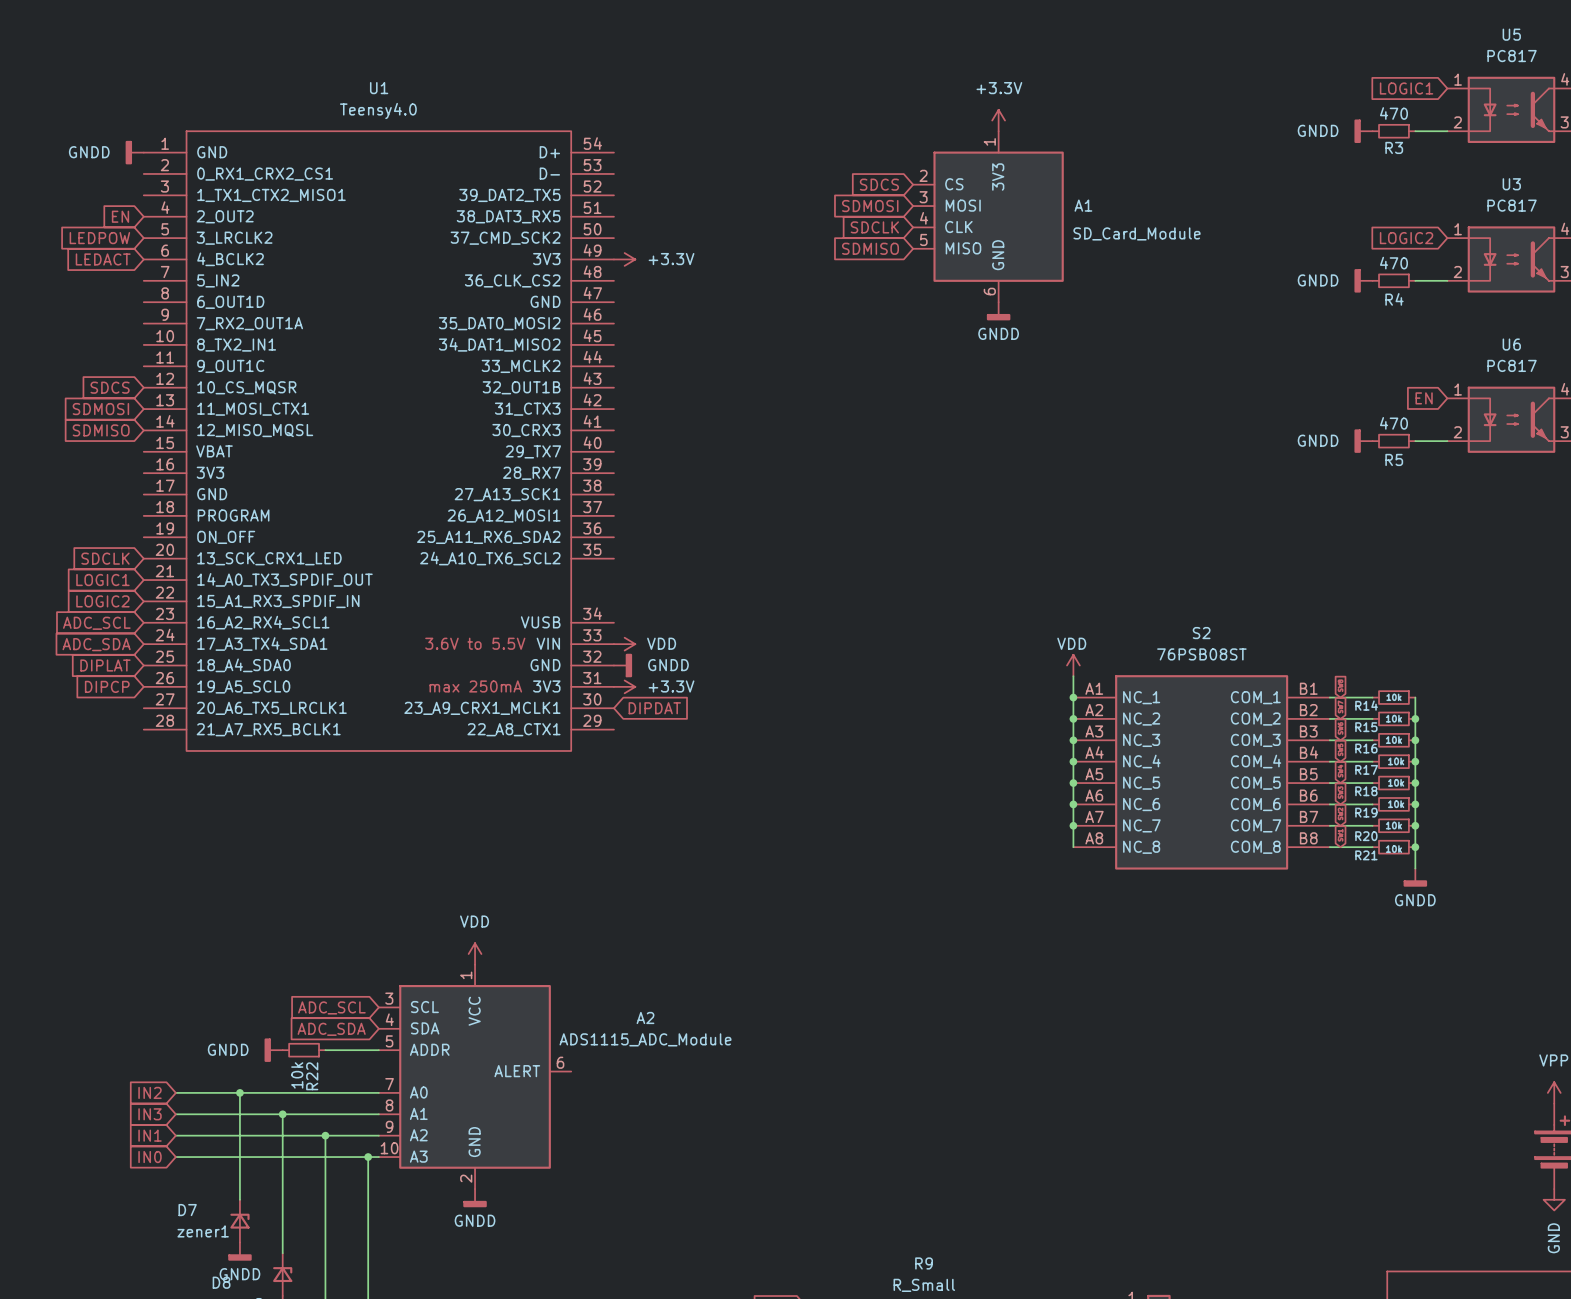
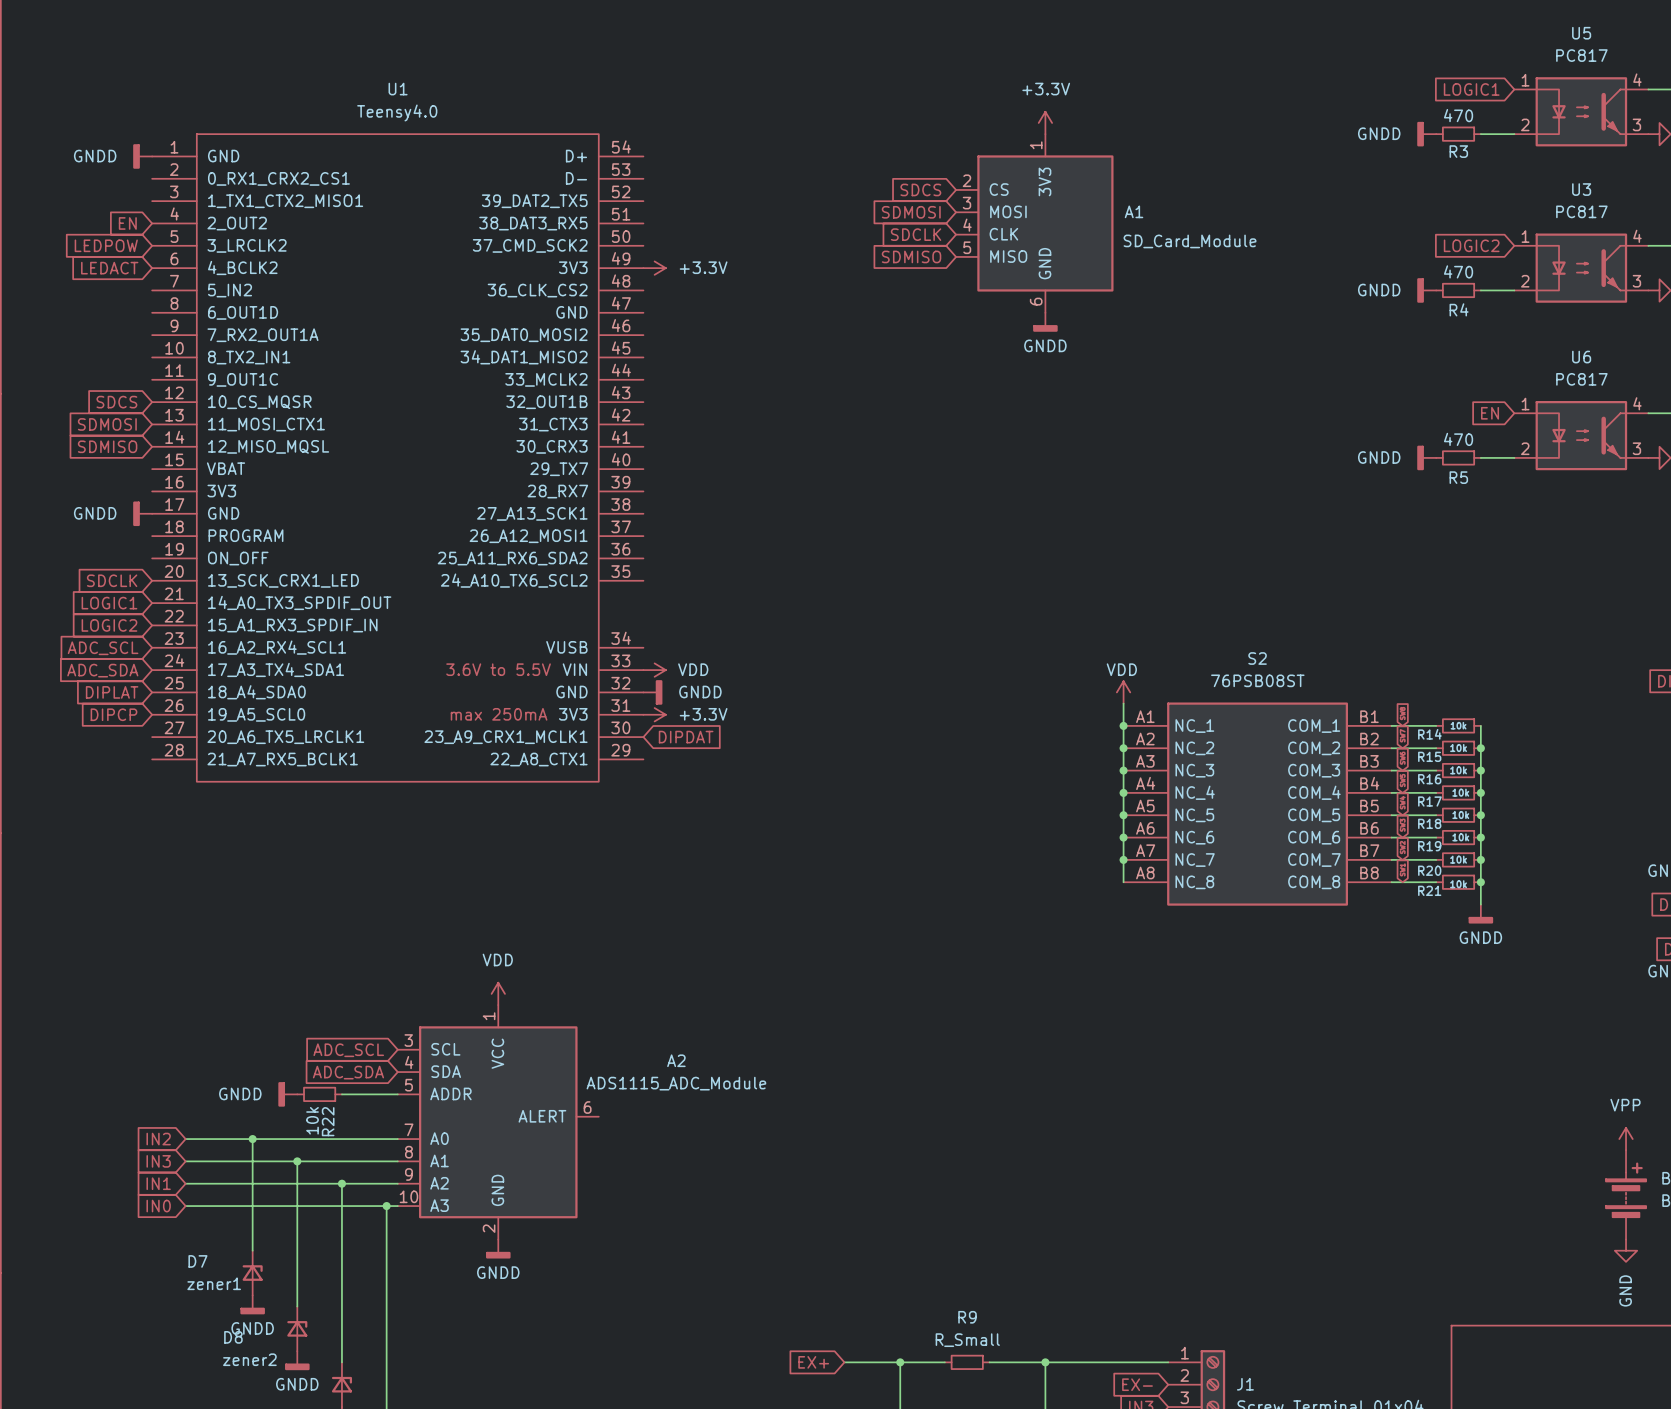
power symbol: none -> GNDD (142, 513)

